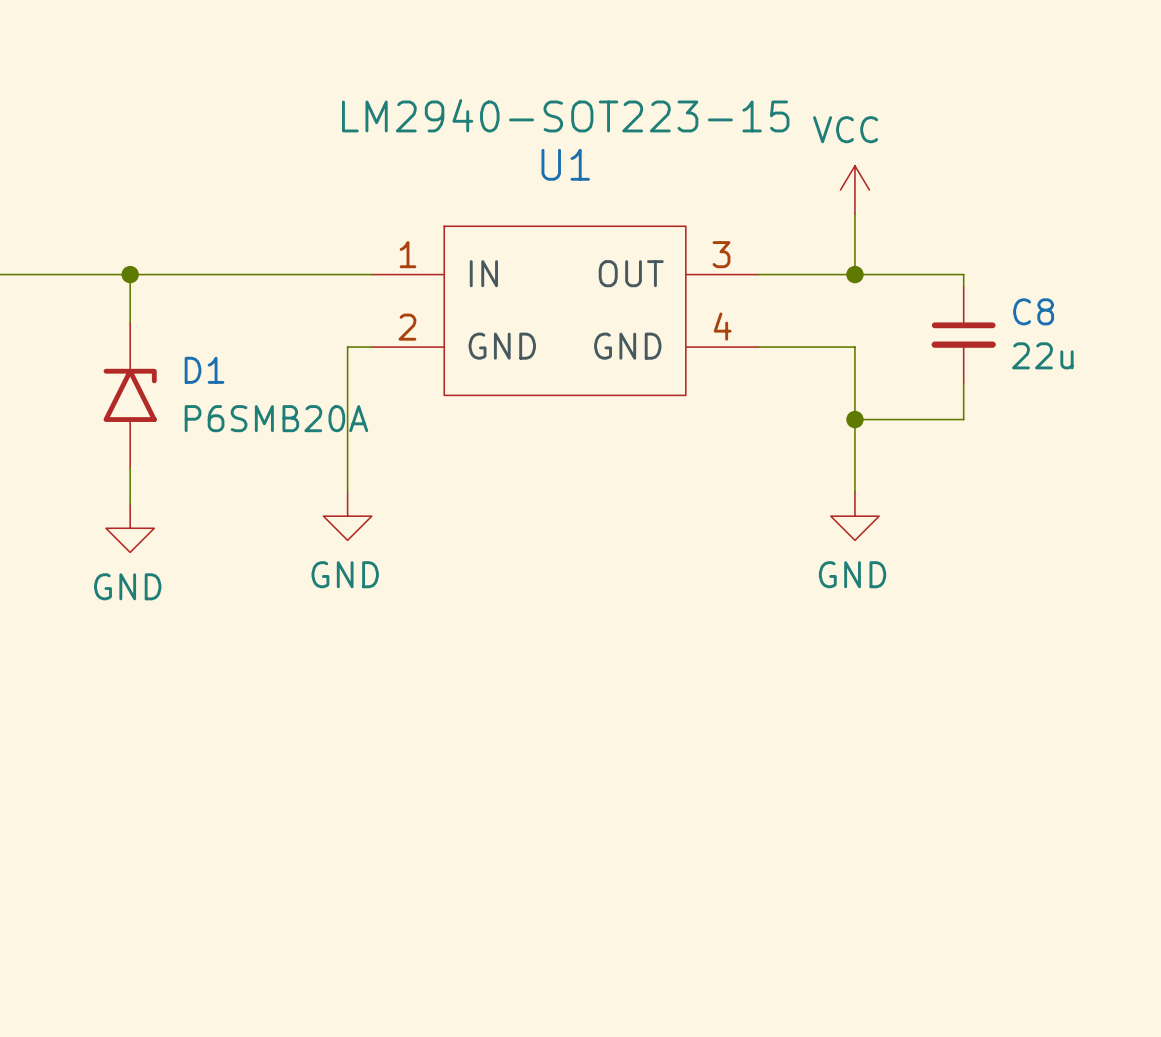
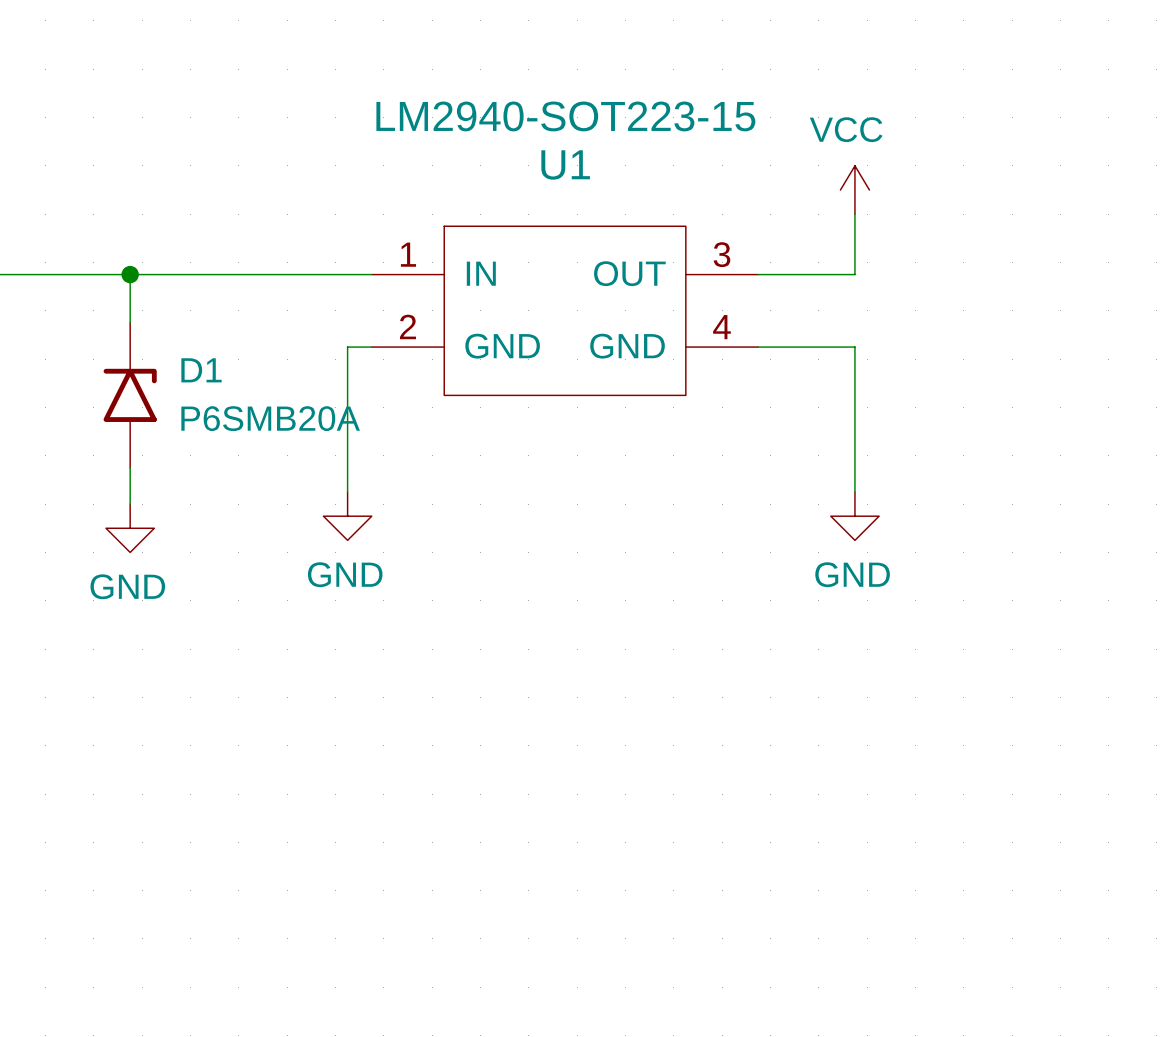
wire: (854, 274) (963, 274) (963, 286) -> none
junction: (854, 274) -> none
C8: 22u (963, 334) -> none
wire: (963, 383) (963, 419) (854, 419) -> none
junction: (854, 419) -> none

